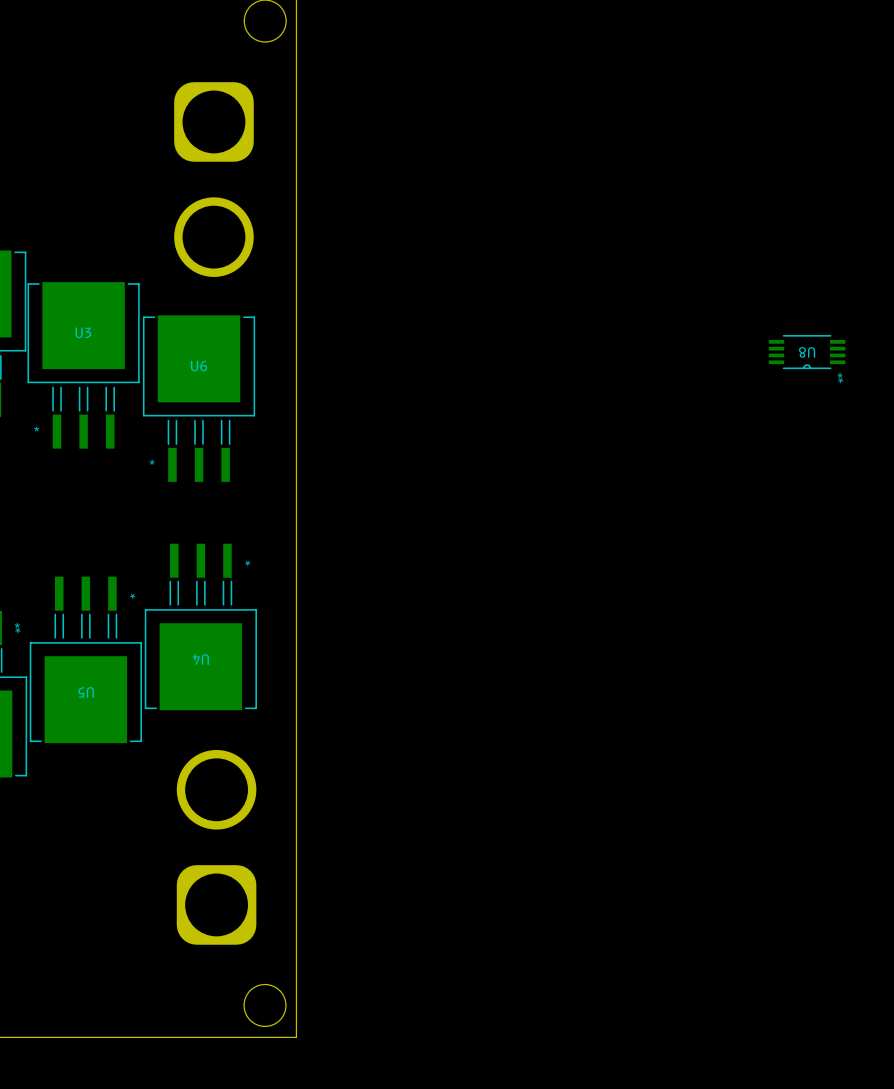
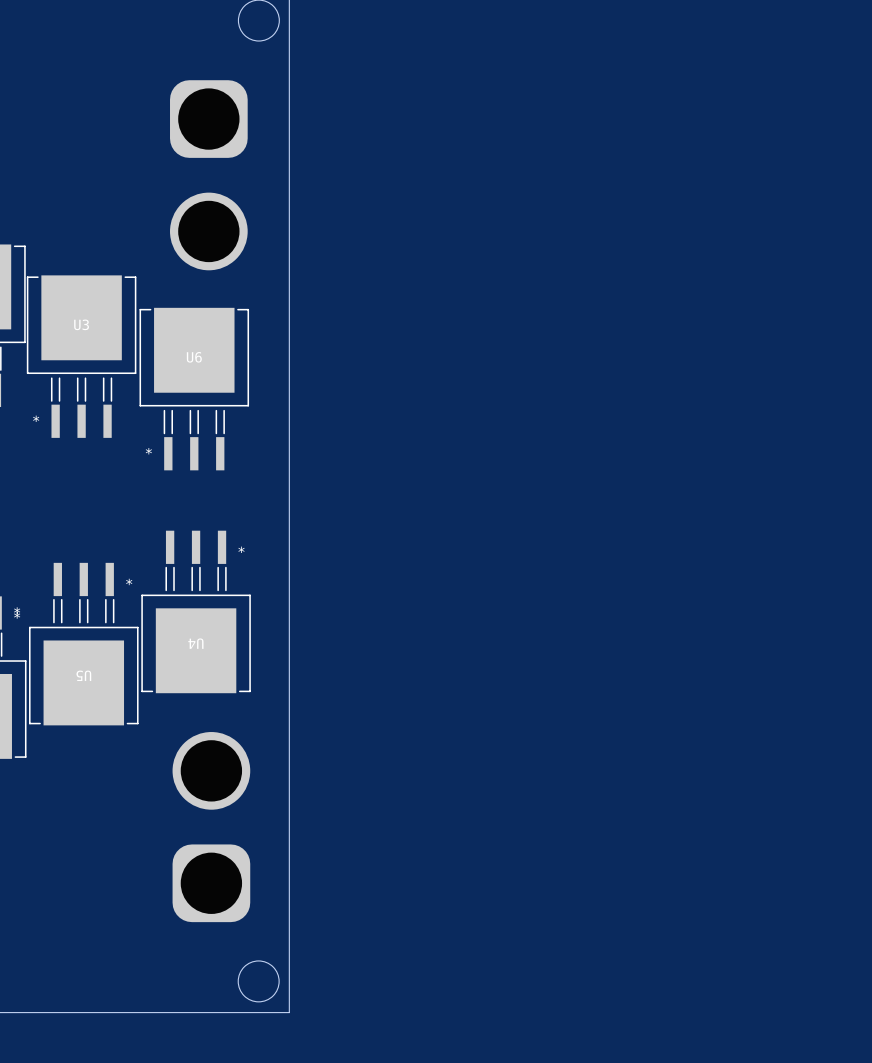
U8: (807, 352) -> none

